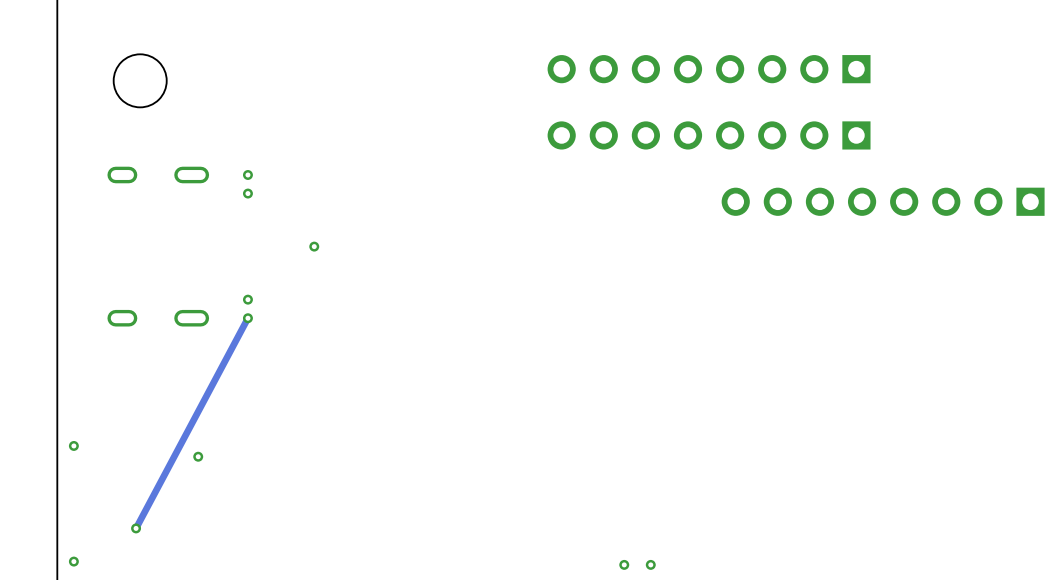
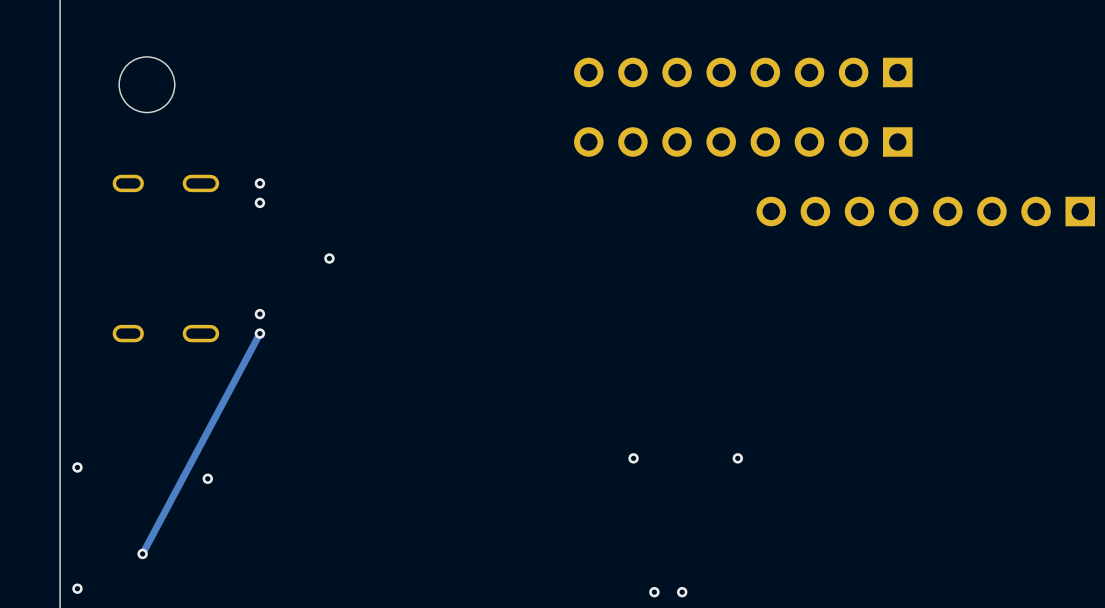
via: none -> (633, 458)
via: none -> (737, 458)

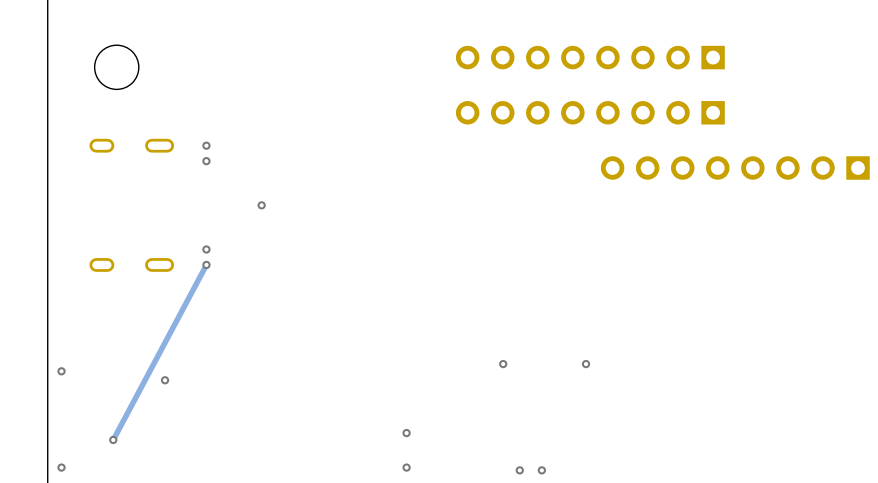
via: none -> (406, 433)
via: none -> (406, 467)

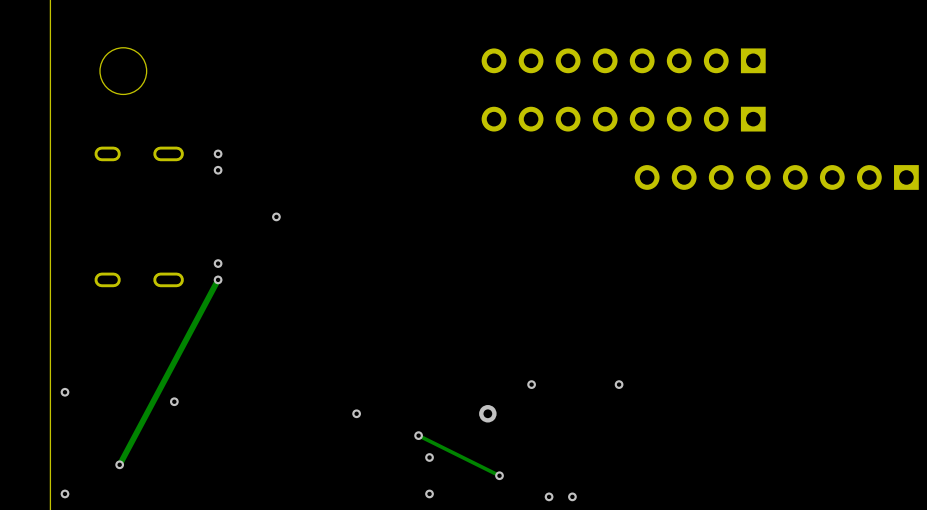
via: none -> (356, 413)
via: none -> (487, 413)
track: none -> (418, 435) (499, 475)
via: none -> (418, 435)
via: none -> (499, 475)

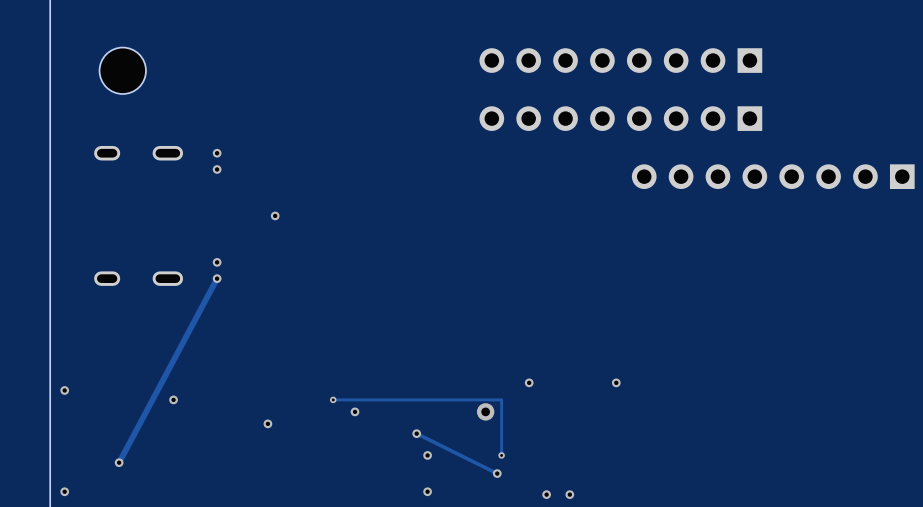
track: none -> (333, 399) (501, 399) (501, 455)
via: none -> (333, 399)
via: none -> (267, 423)
via: none -> (501, 455)

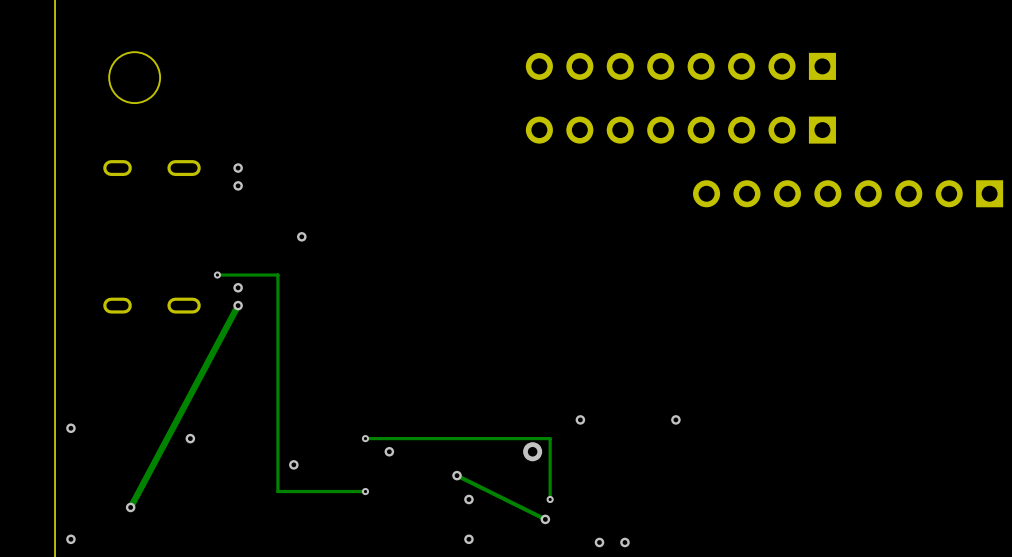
track: none -> (217, 275) (277, 275) (277, 491) (365, 491)
via: none -> (217, 275)
via: none -> (365, 491)

